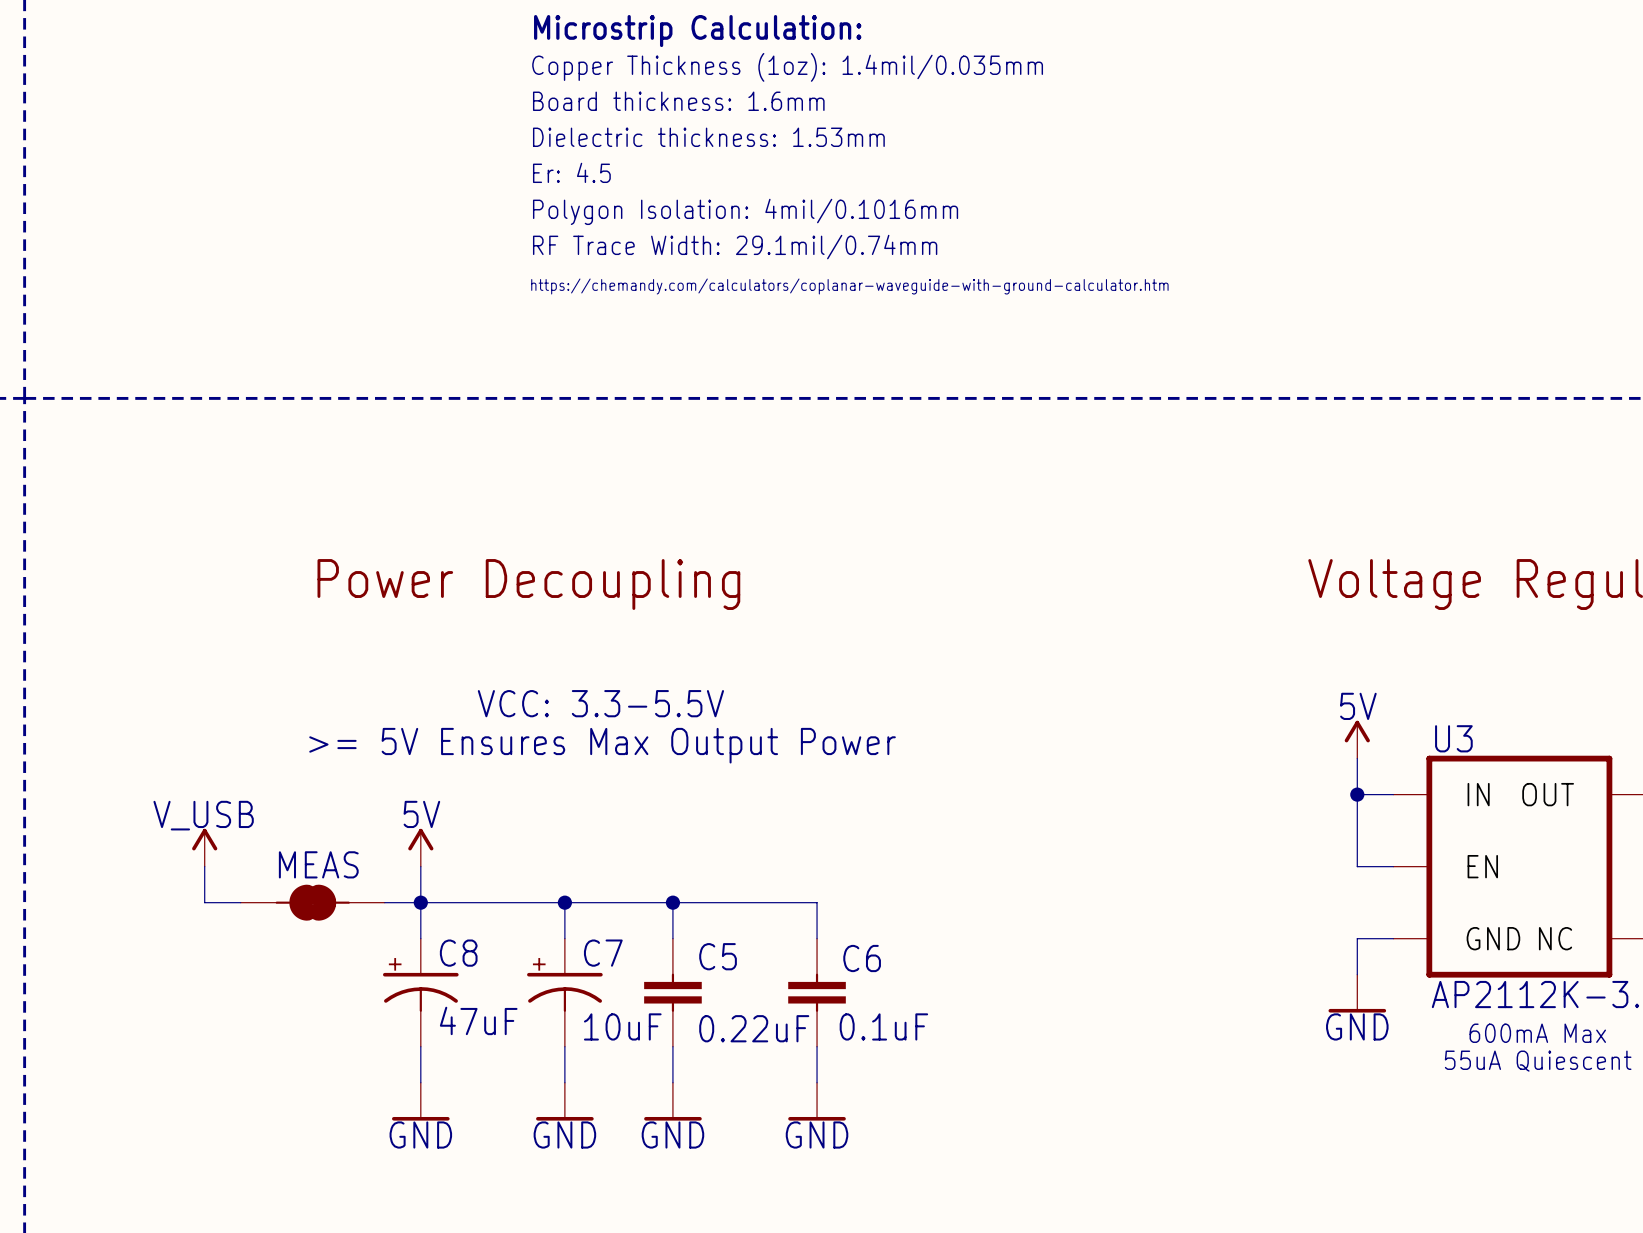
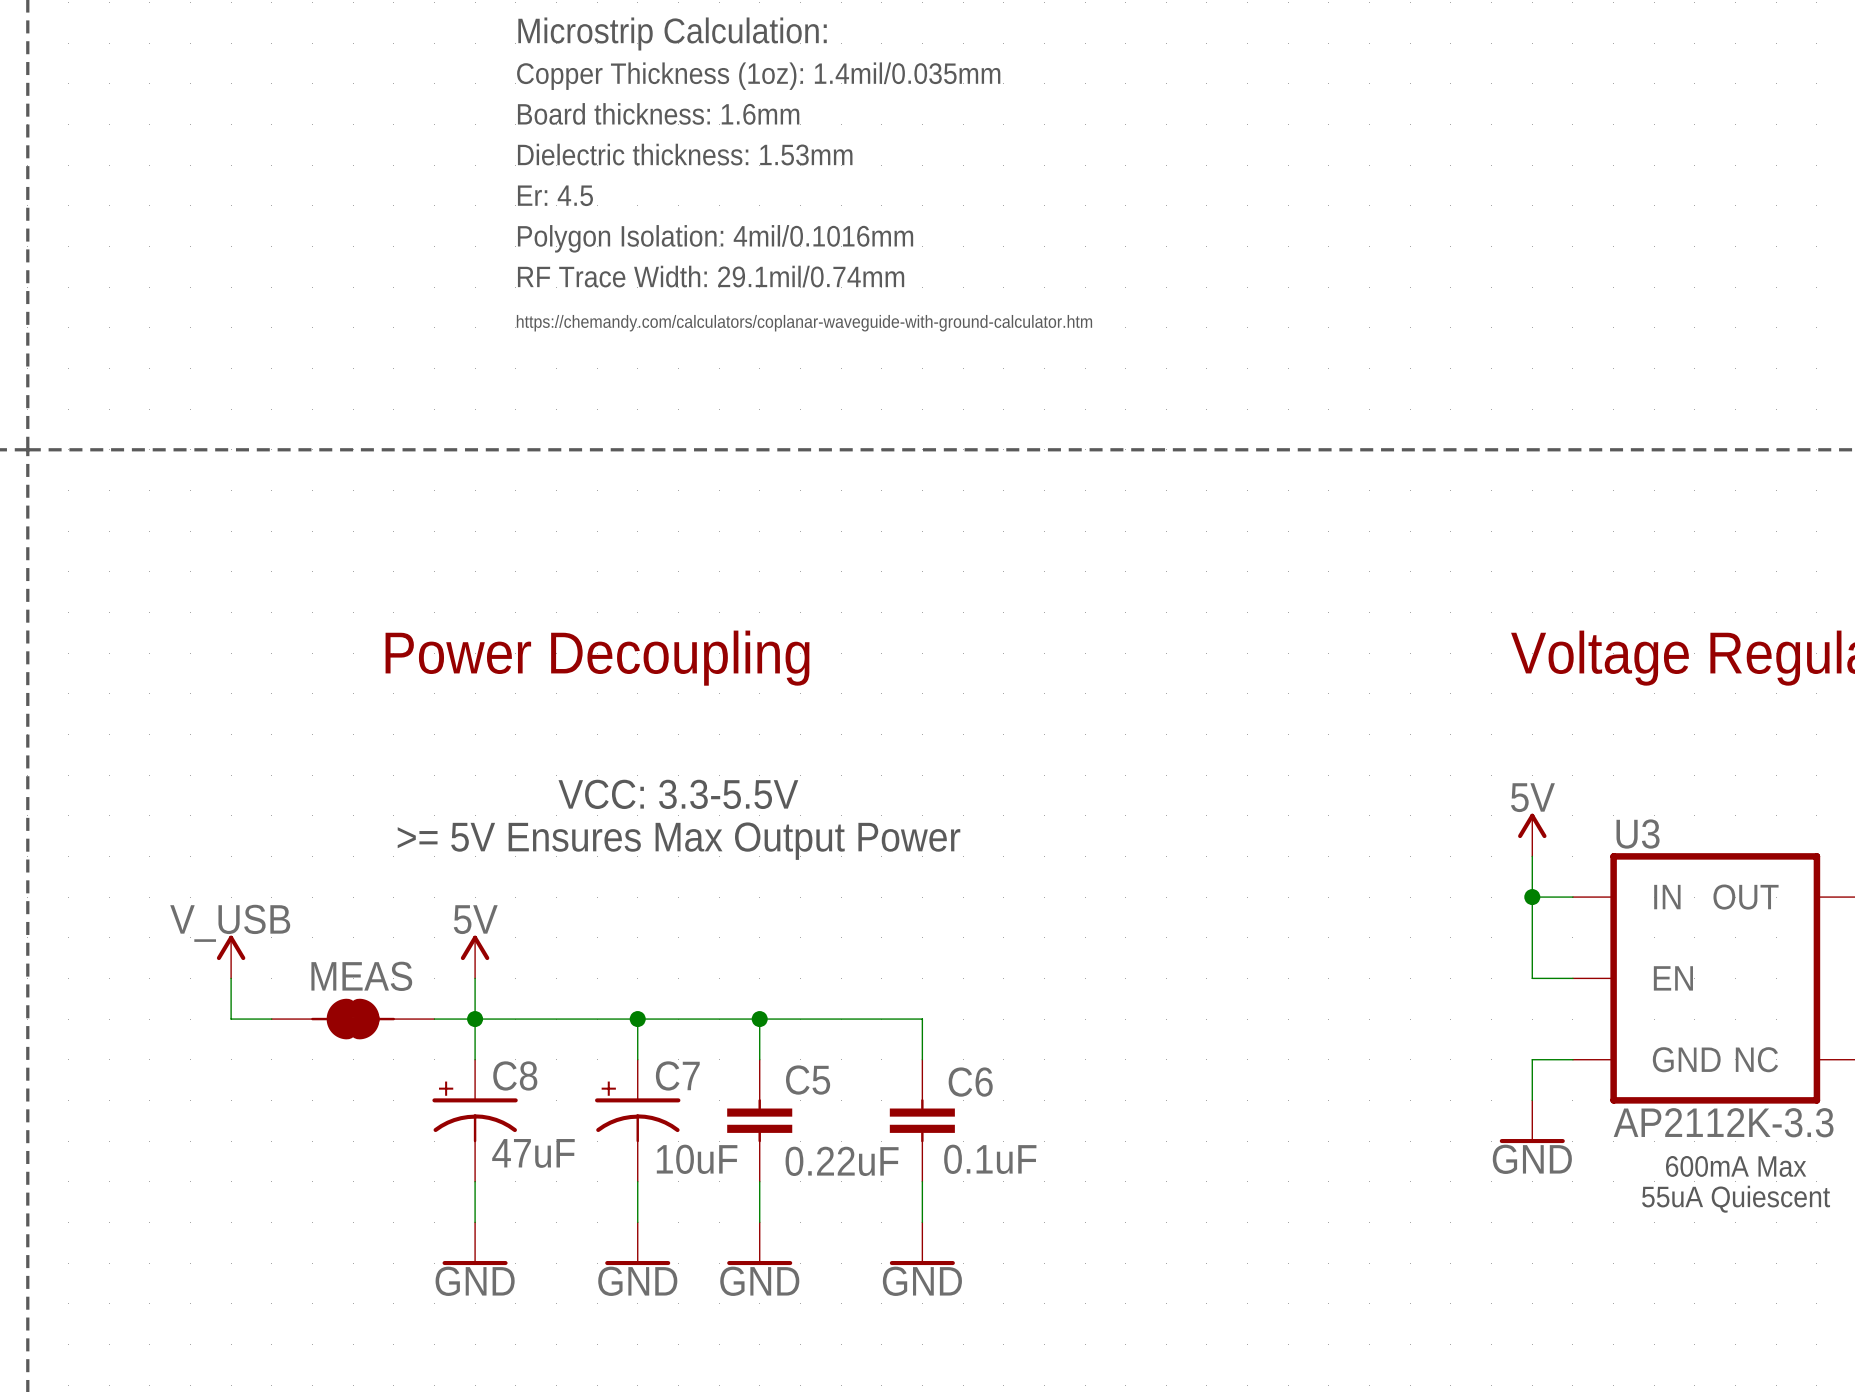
text position: Microstrip Calculation: (697, 31) -> Microstrip Calculation: (672, 33)
text position: Copper Thickness (1oz): 1.4mil/0.035mm (787, 67) -> Copper Thickness (1oz): 1.4mil/0.035mm (758, 76)
text position: Board thickness: 1.6mm (678, 101) -> Board thickness: 1.6mm (658, 113)
text position: Dielectric thickness: 1.53mm (708, 137) -> Dielectric thickness: 1.53mm (685, 154)
text position: Er: 4.5 (571, 172) -> Er: 4.5 (555, 195)
text position: Polygon Isolation: 4mil/0.1016mm (745, 211) -> Polygon Isolation: 4mil/0.1016mm (715, 238)
text position: RF Trace Width: 29.1mil/0.74mm (735, 247) -> RF Trace Width: 29.1mil/0.74mm (711, 276)
text position: https://chemandy.com/calculators/coplanar-waveguide-with-ground-calculator.htm (849, 286) -> https://chemandy.com/calculators/coplanar-waveguide-with-ground-calculator.htm (804, 323)

